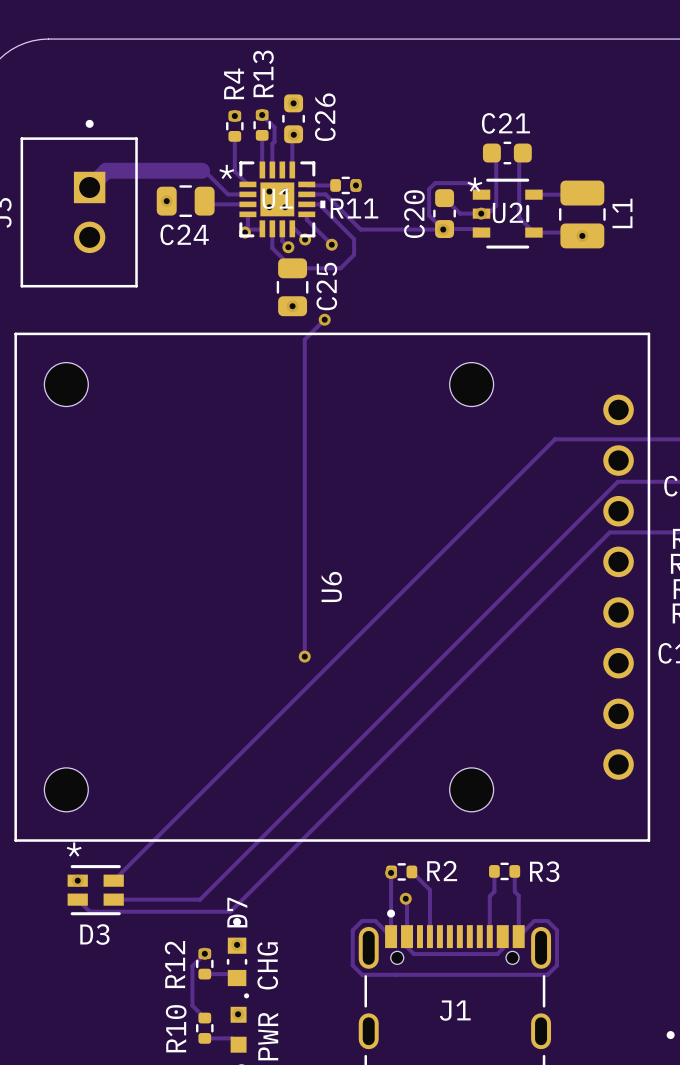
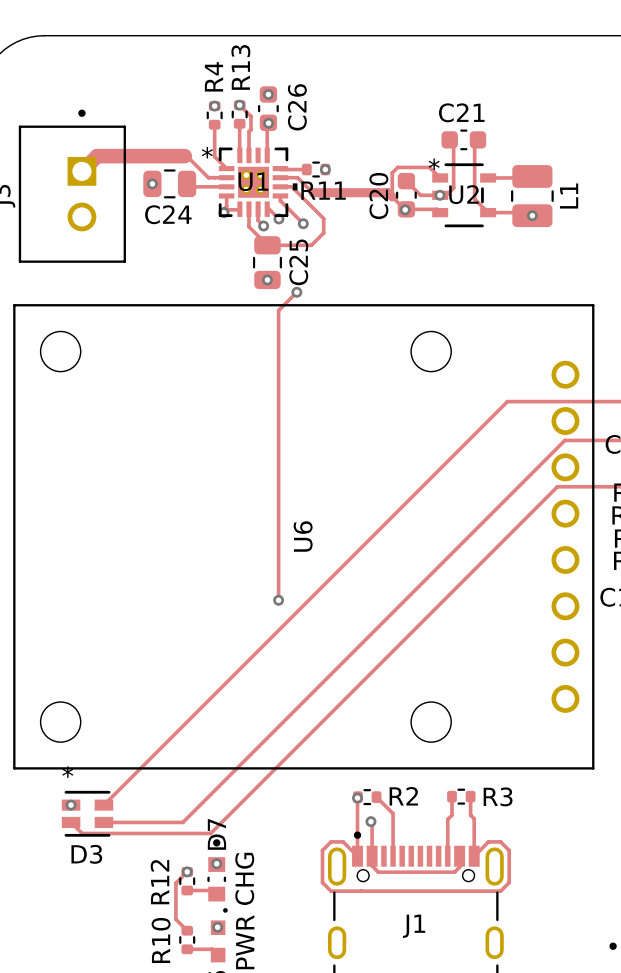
track: (341, 210) (360, 229) (443, 229) -> (312, 192) (388, 192) (392, 196)

